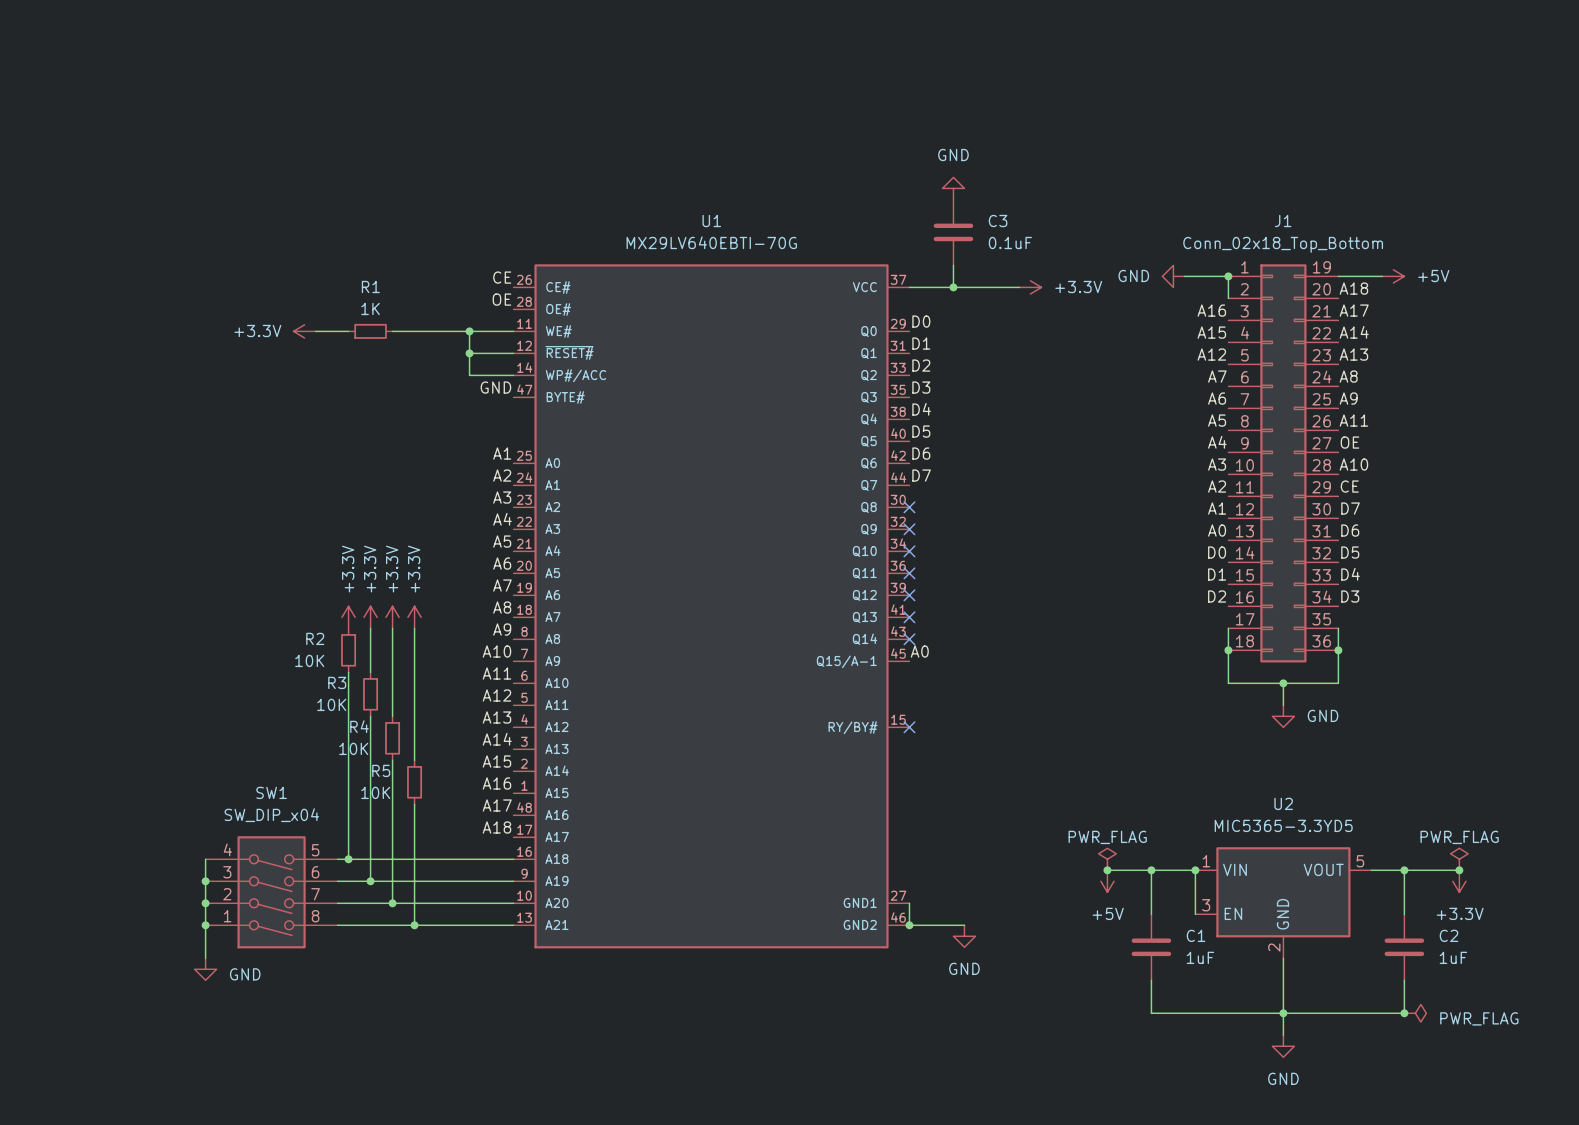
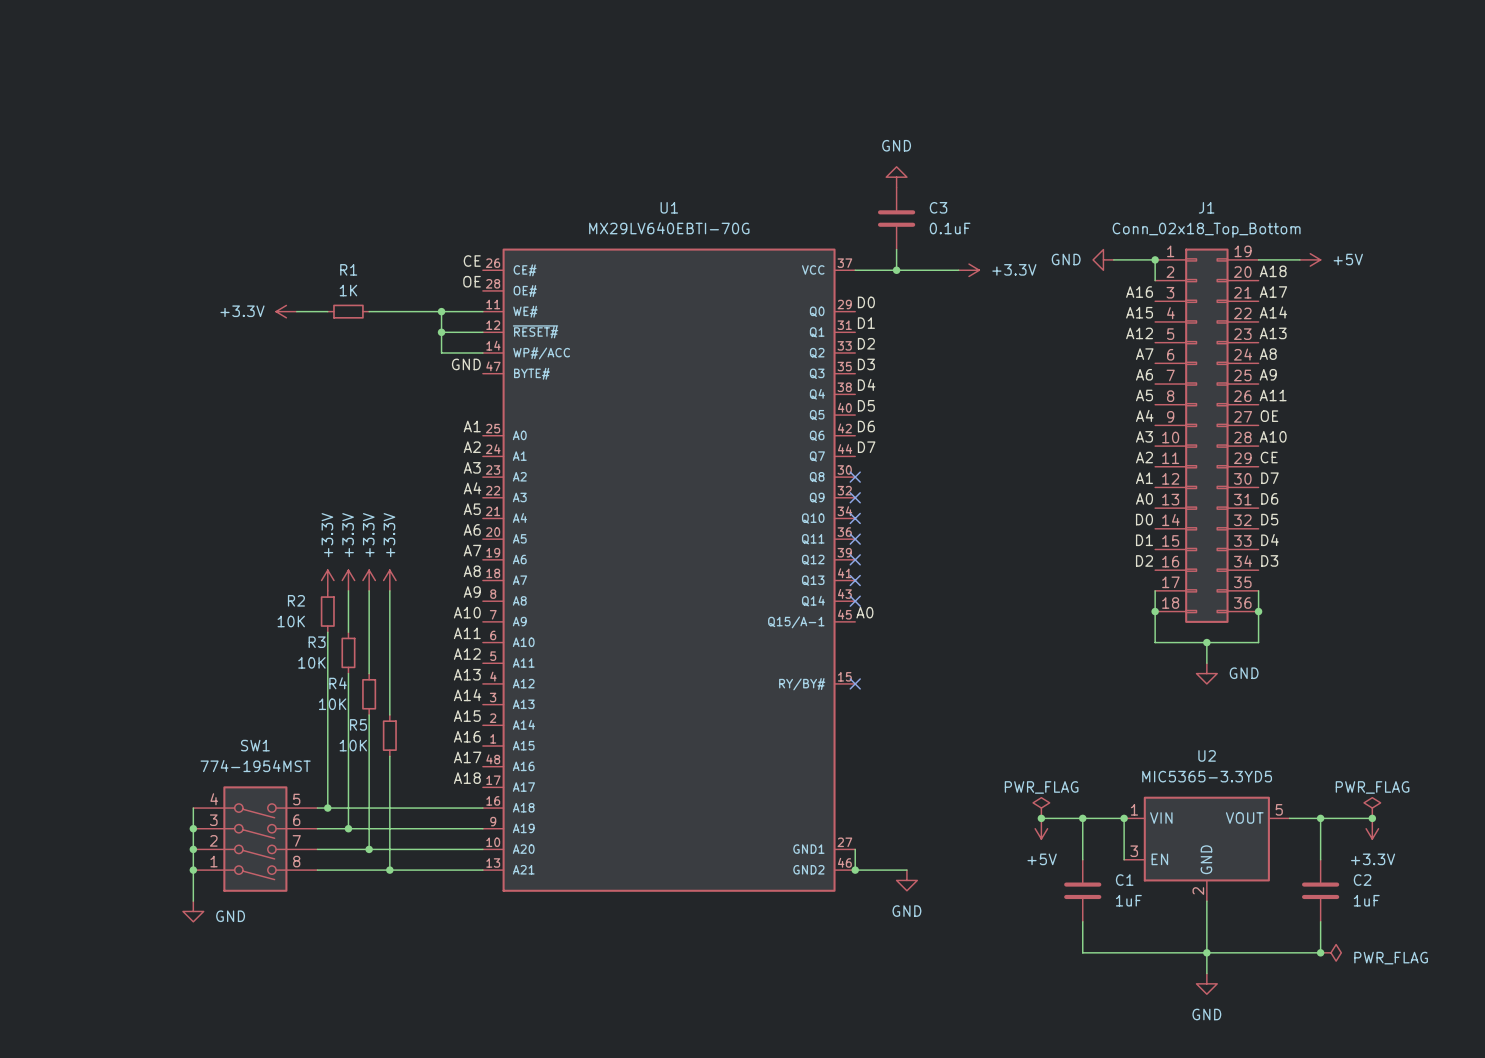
SW1 value: SW_DIP_x04 (271, 815) -> 774-1954MST (255, 766)

